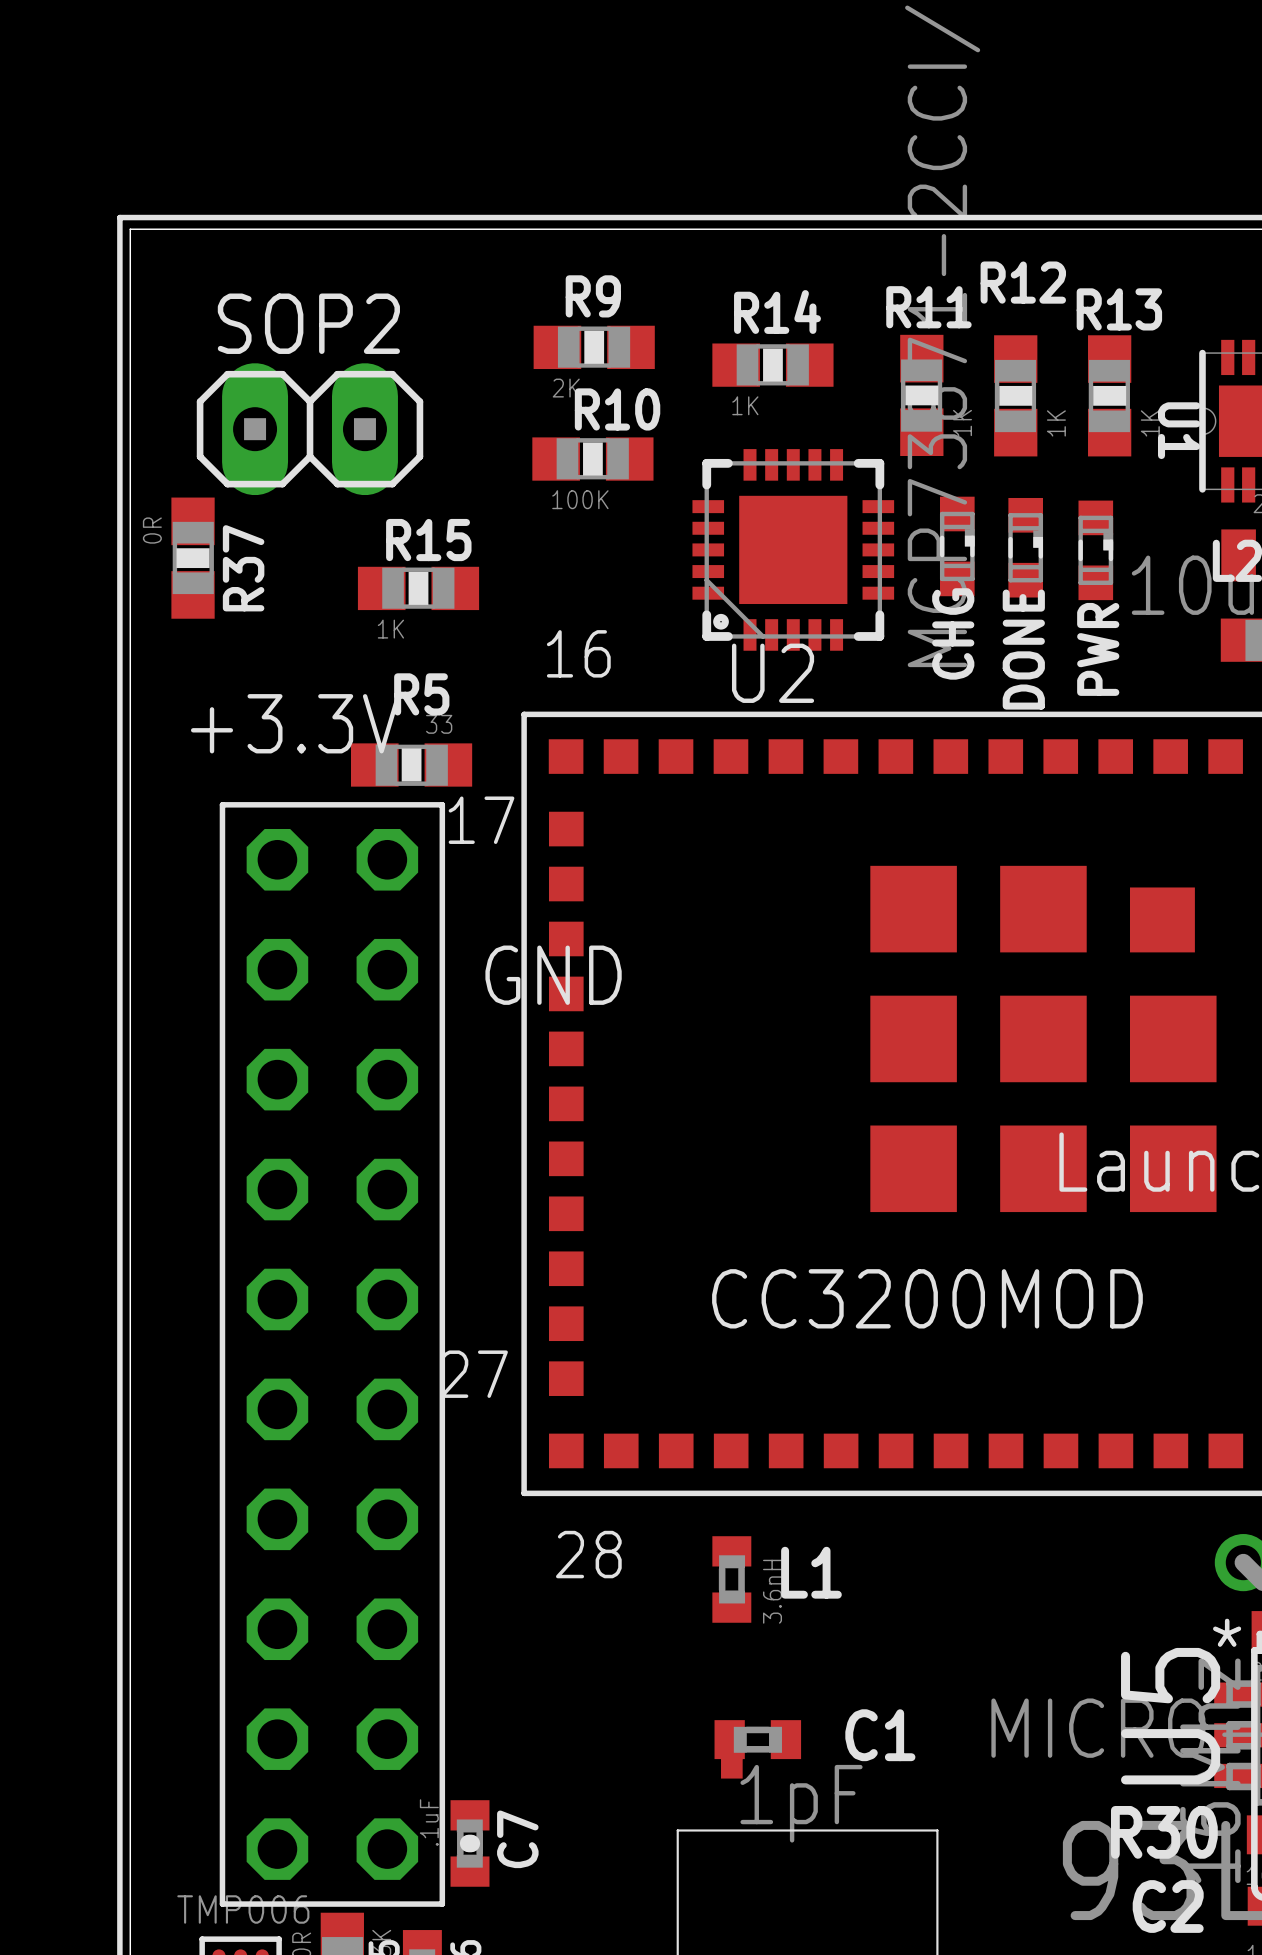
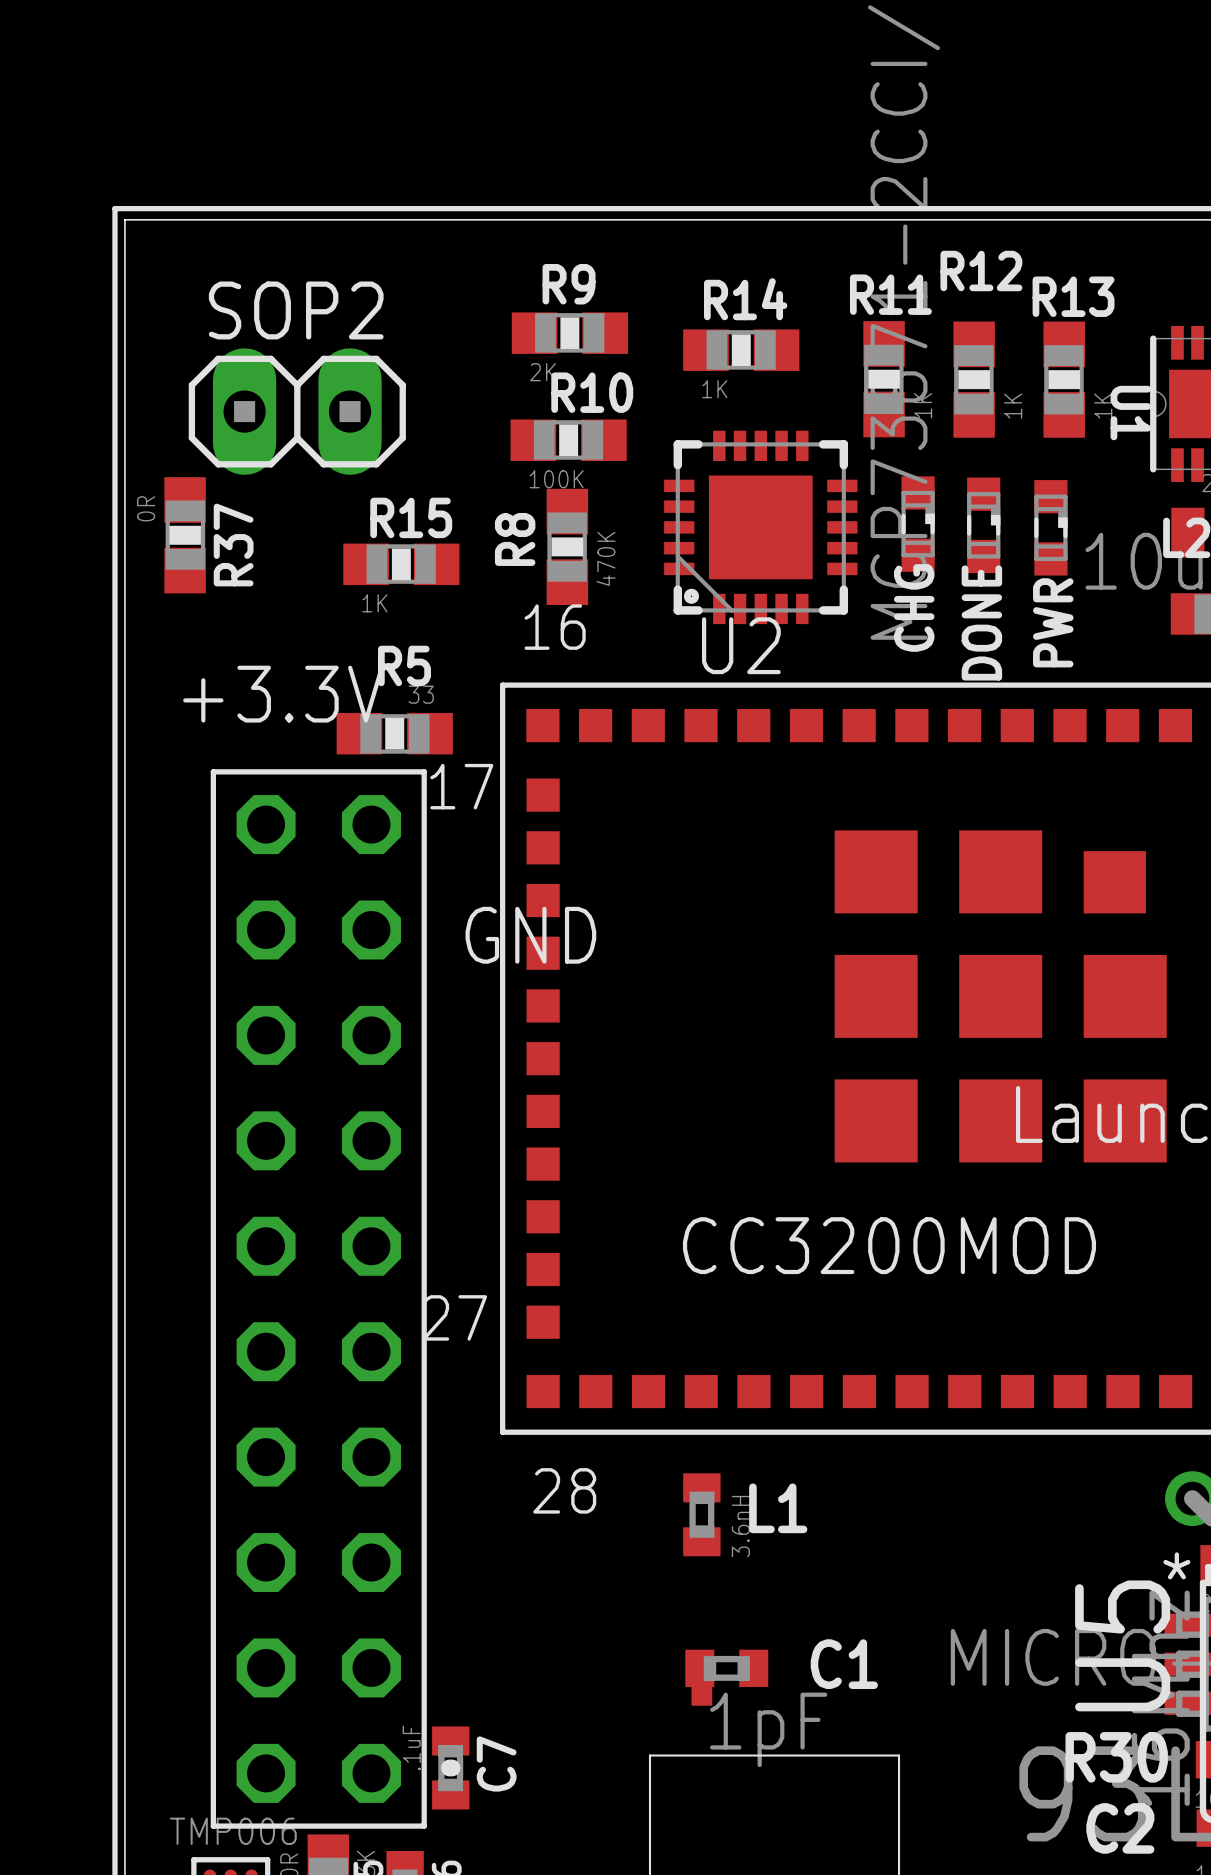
R8: none -> 470K (567, 546)

